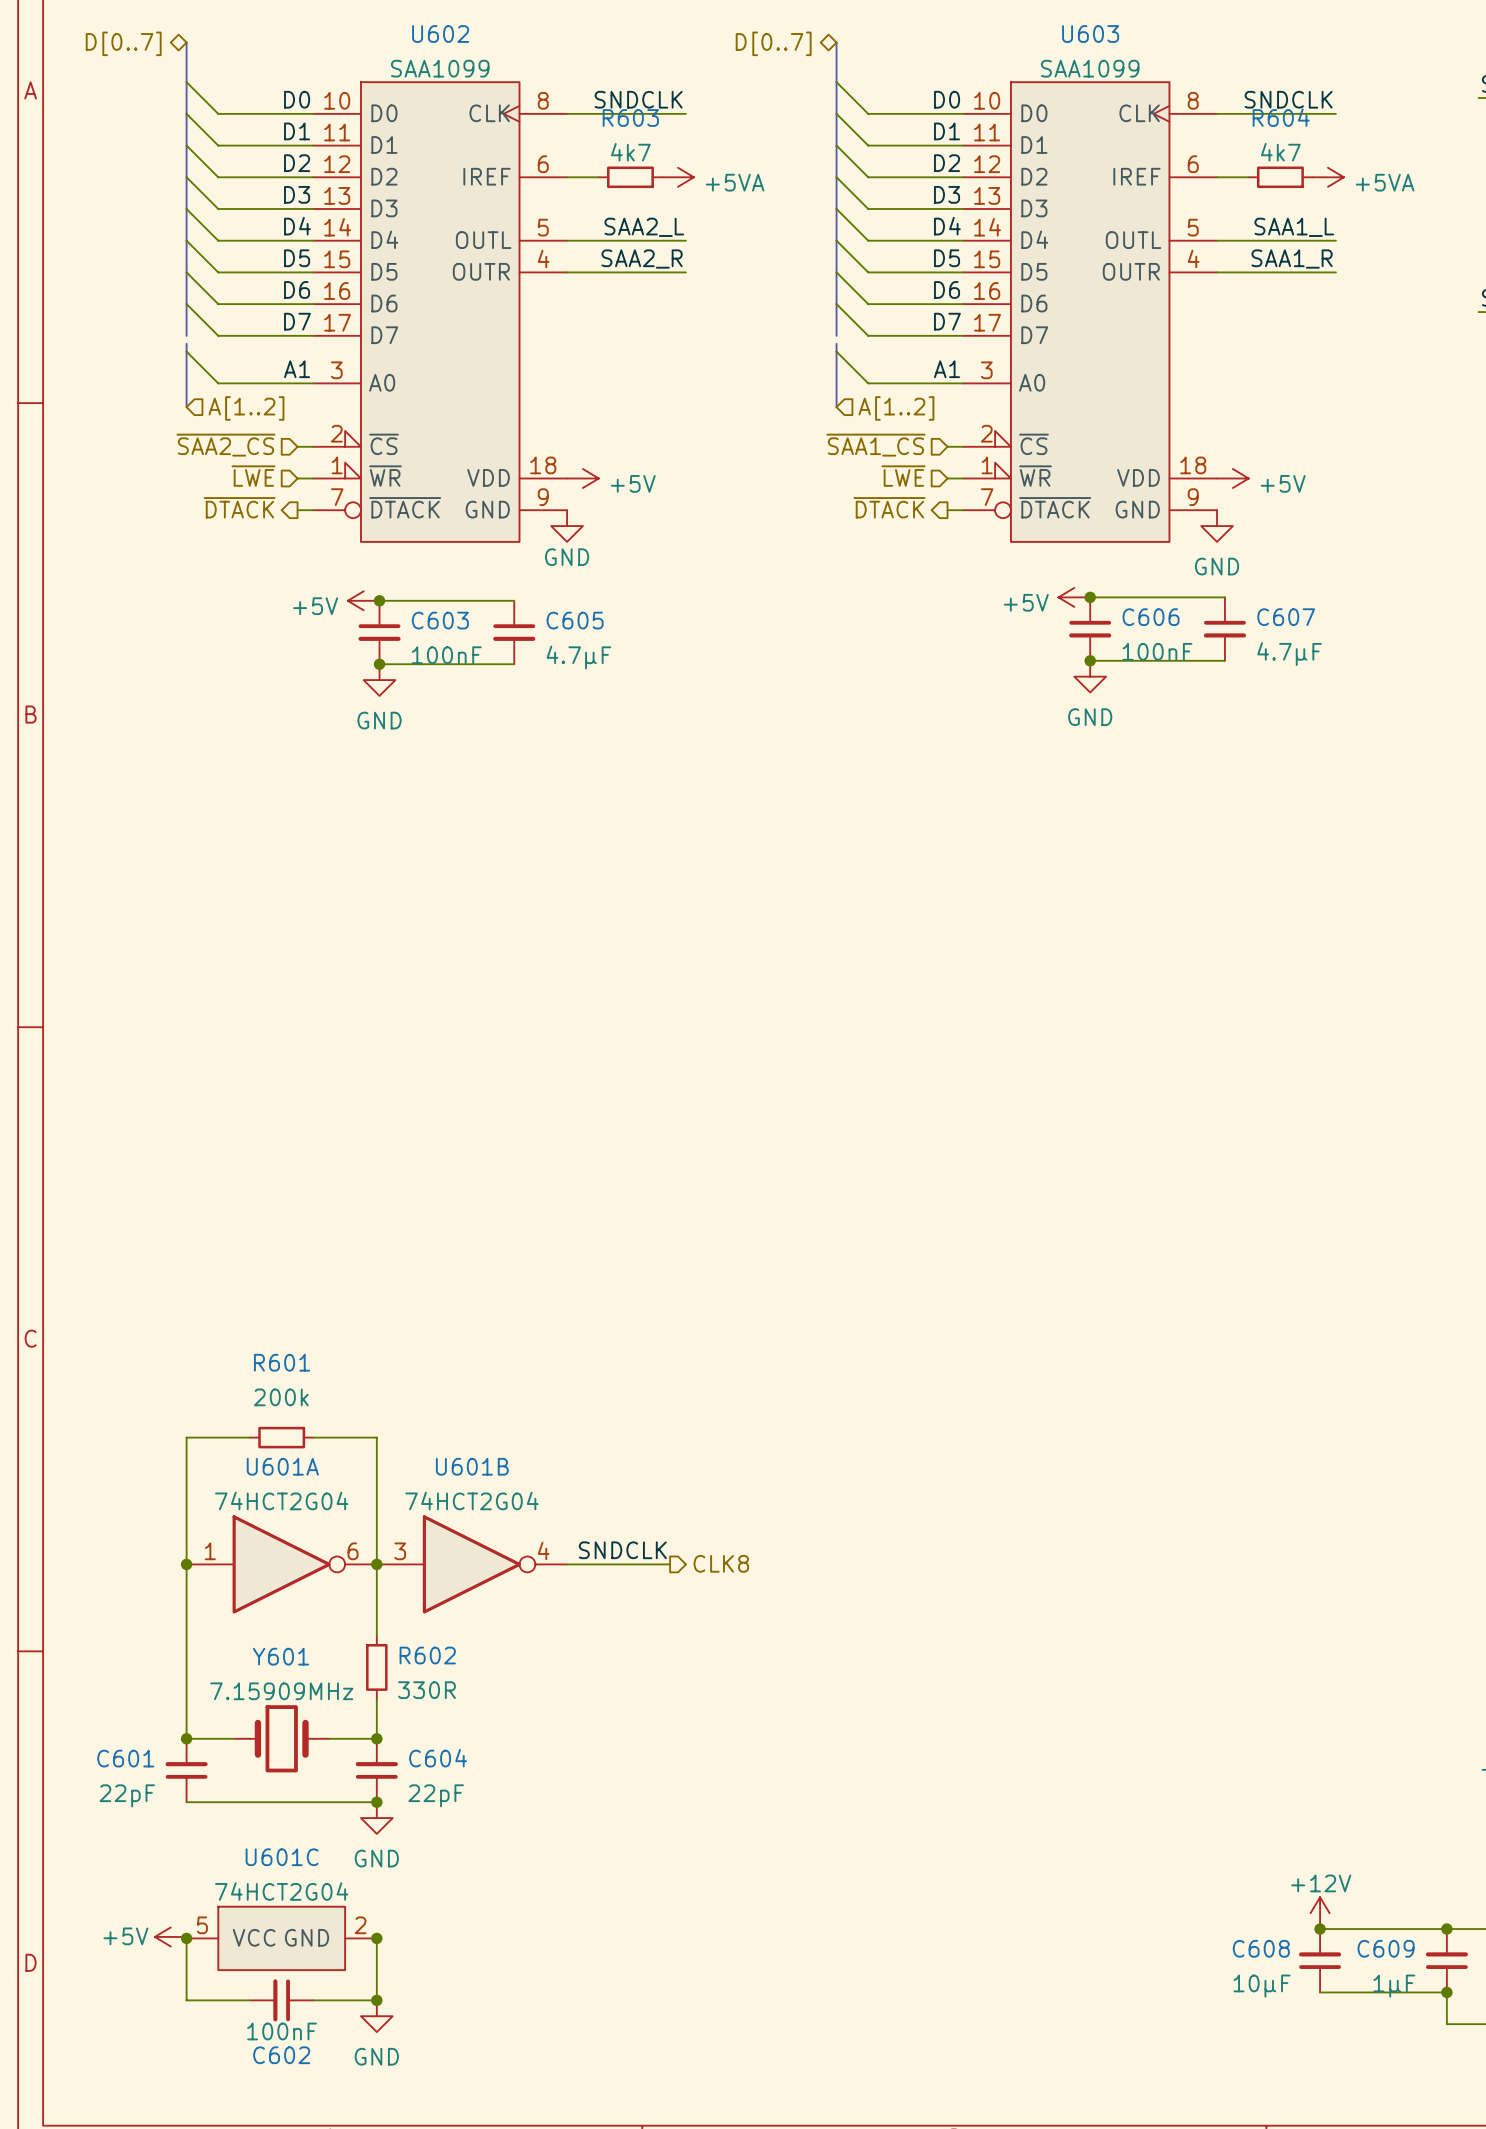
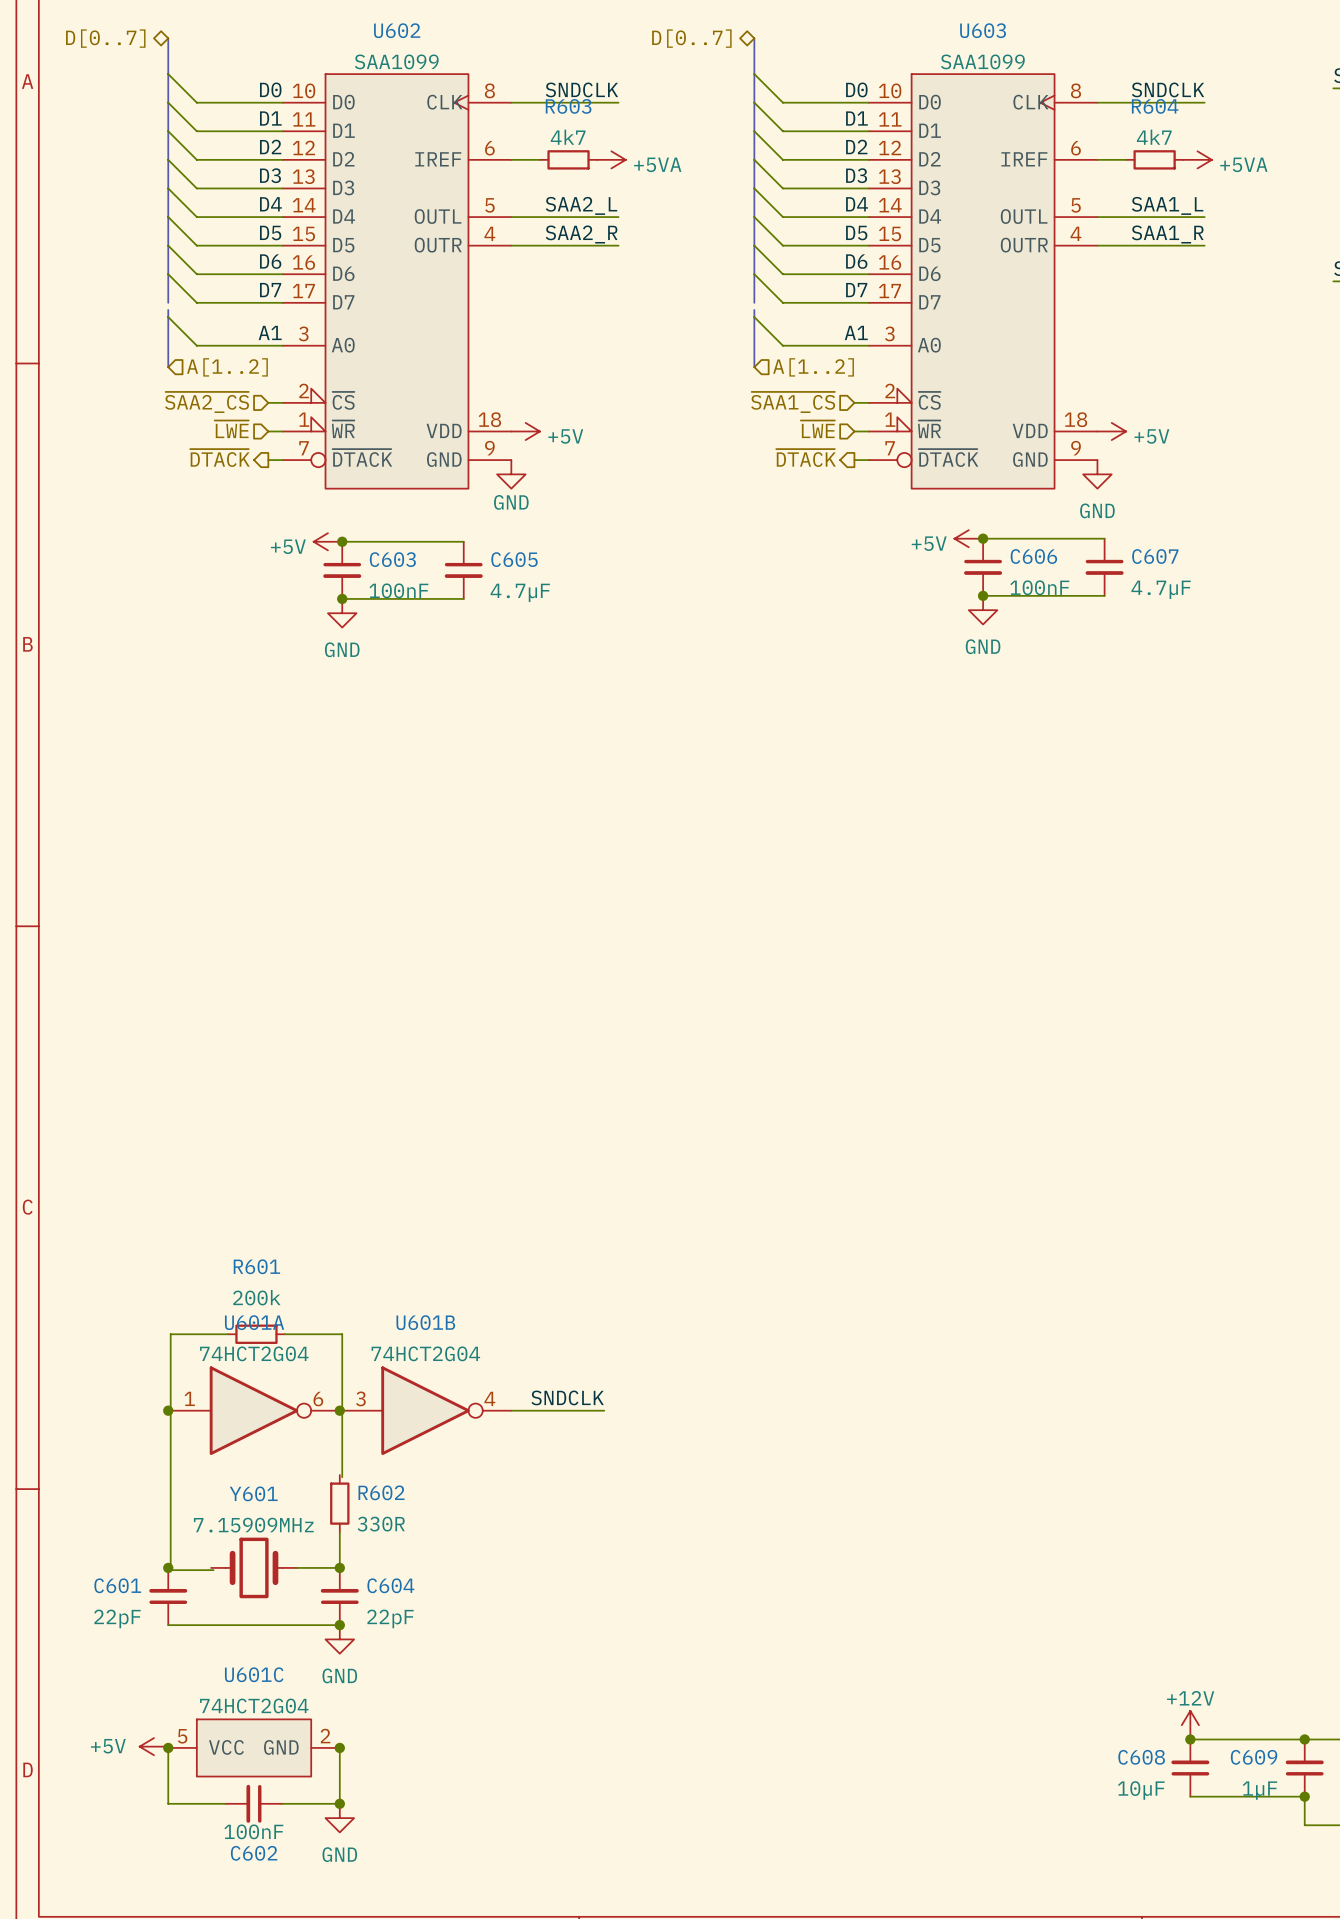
wire: (250, 1437) (186, 1437) (186, 1738) (234, 1738) -> none
R601 position: (281, 1437) -> (256, 1334)
wire: (313, 1437) (376, 1437) (376, 1635) -> none
wire: none -> (227, 1334) (170, 1334) (170, 1570) (213, 1570)
wire: none -> (285, 1334) (342, 1334) (342, 1477)
hierarchical label: CLK8 (721, 1563) -> none

